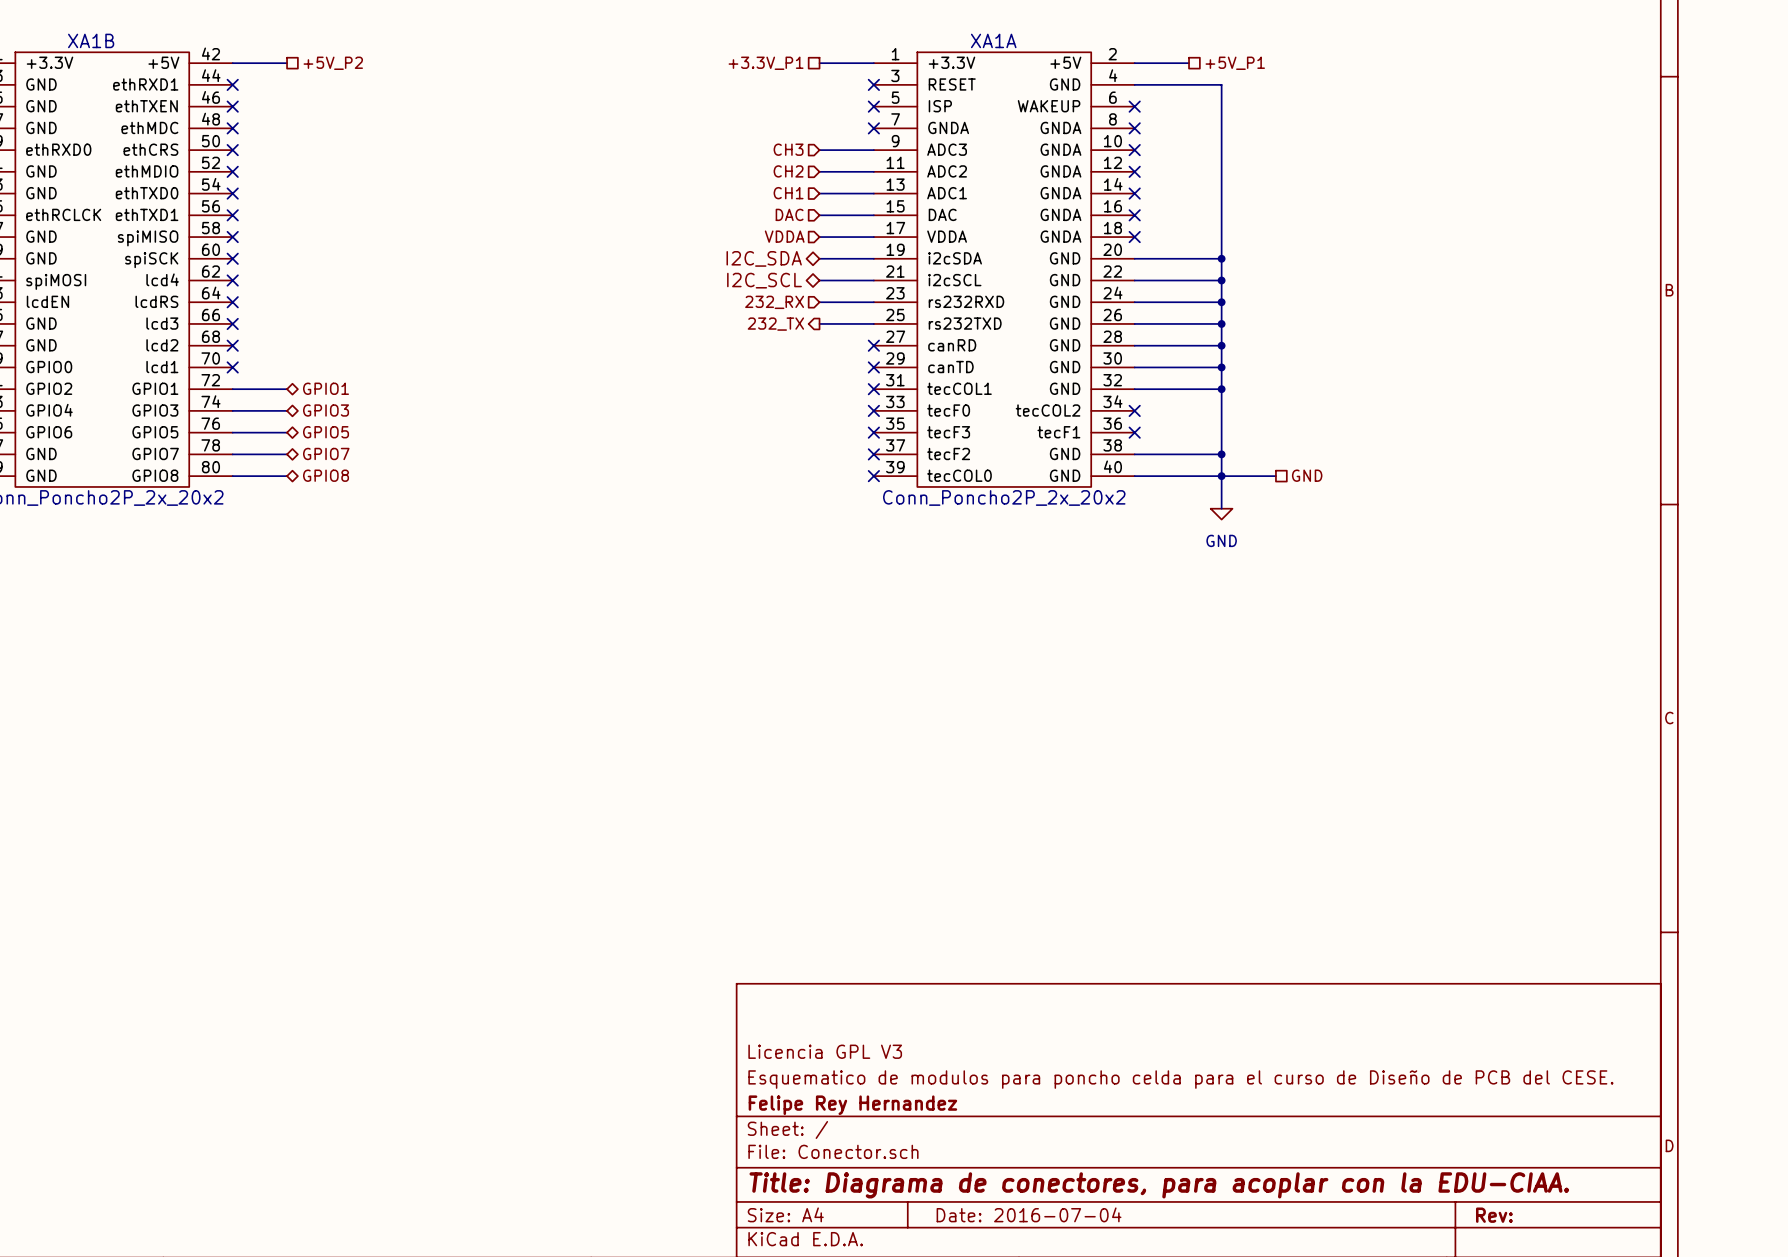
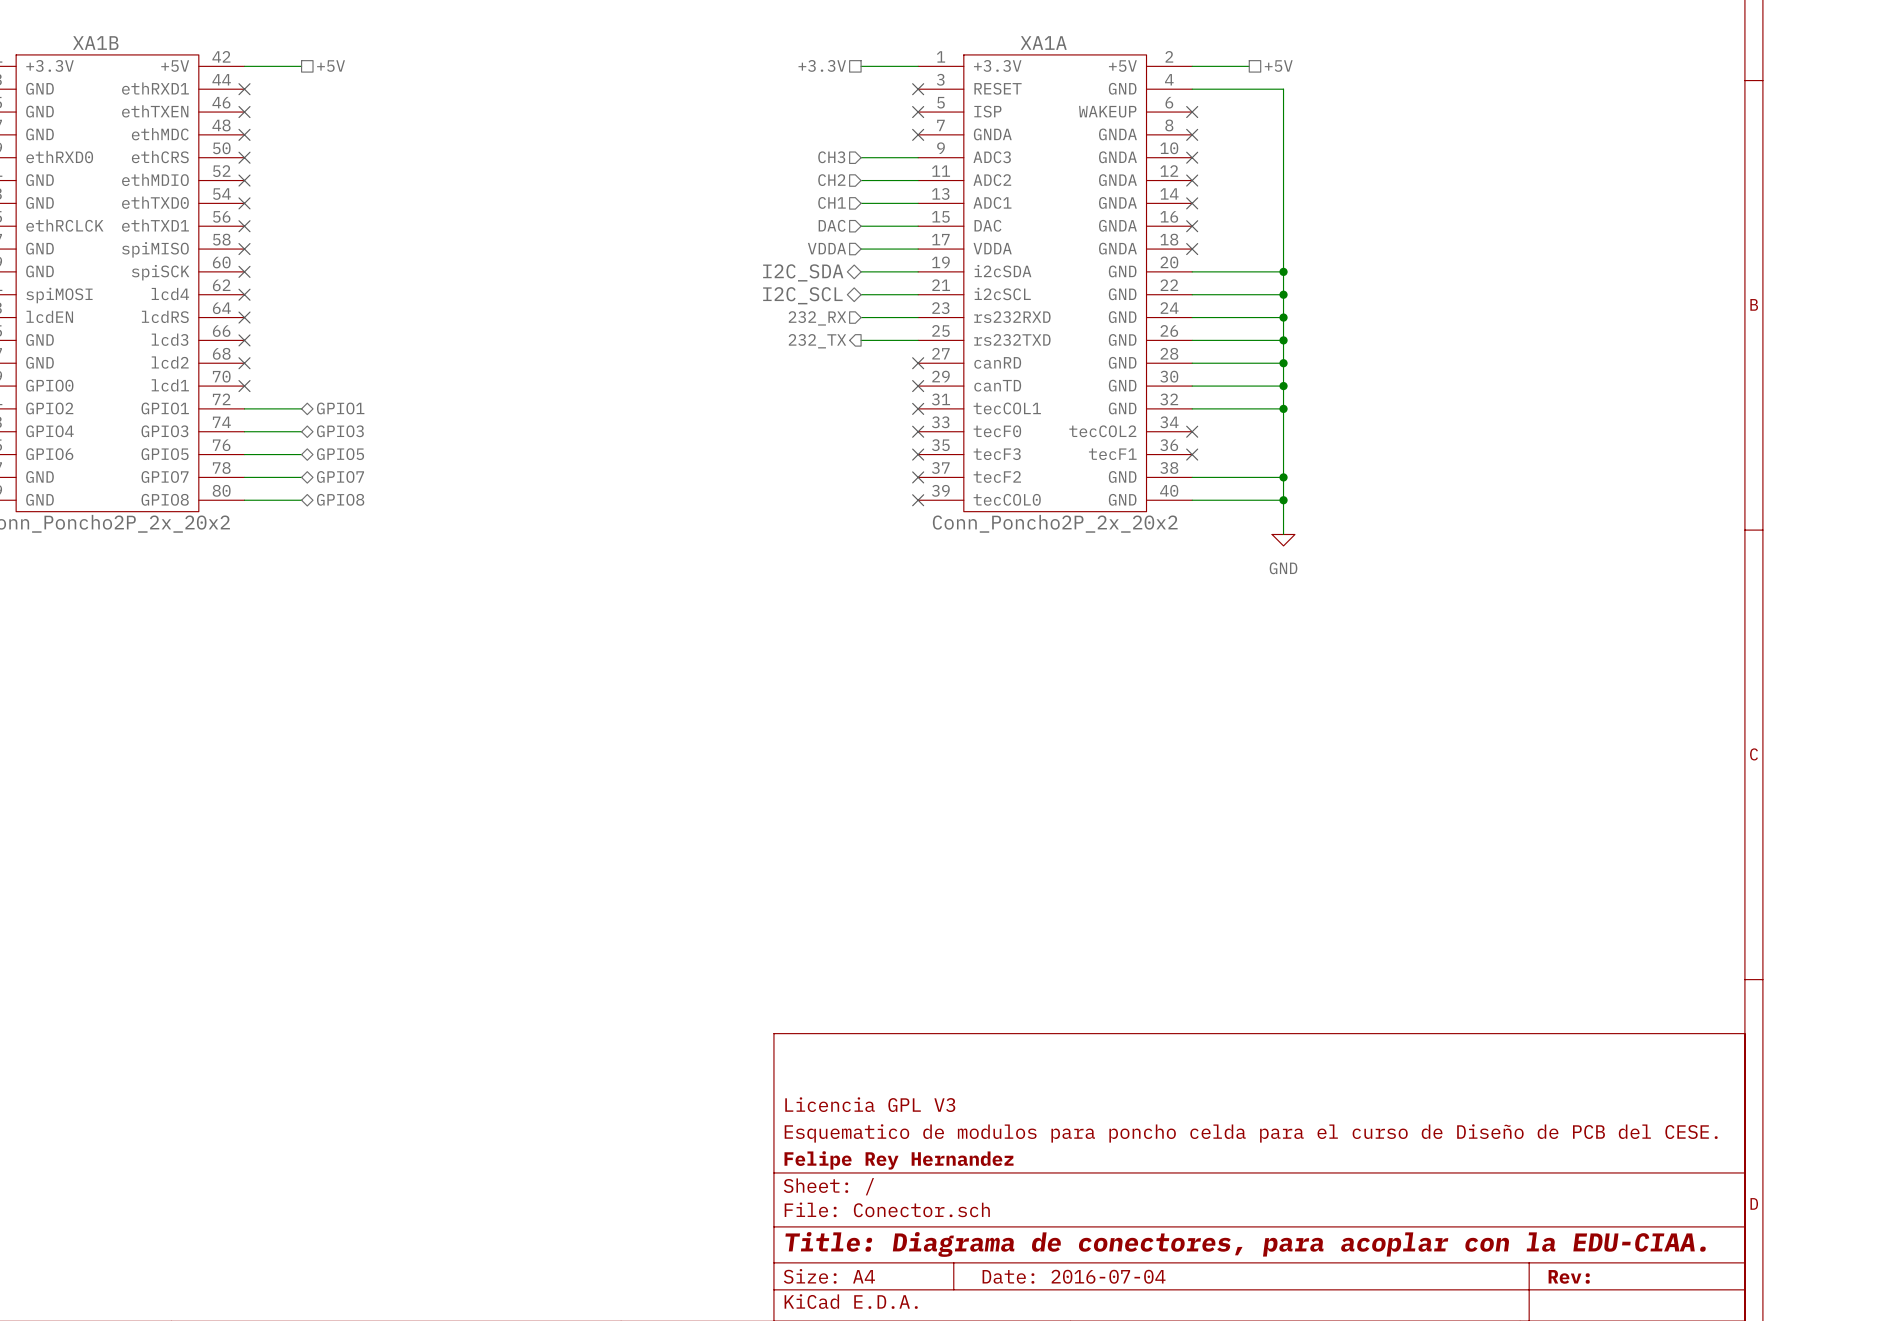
hierarchical label: +5V_P2 (333, 63) -> +5V (331, 66)
hierarchical label: +3.3V_P1 (766, 63) -> +3.3V (822, 65)
hierarchical label: +5V_P1 (1235, 63) -> +5V (1278, 66)
hierarchical label: GND (1307, 475) -> none
wire: (1221, 476) (1275, 476) -> none

